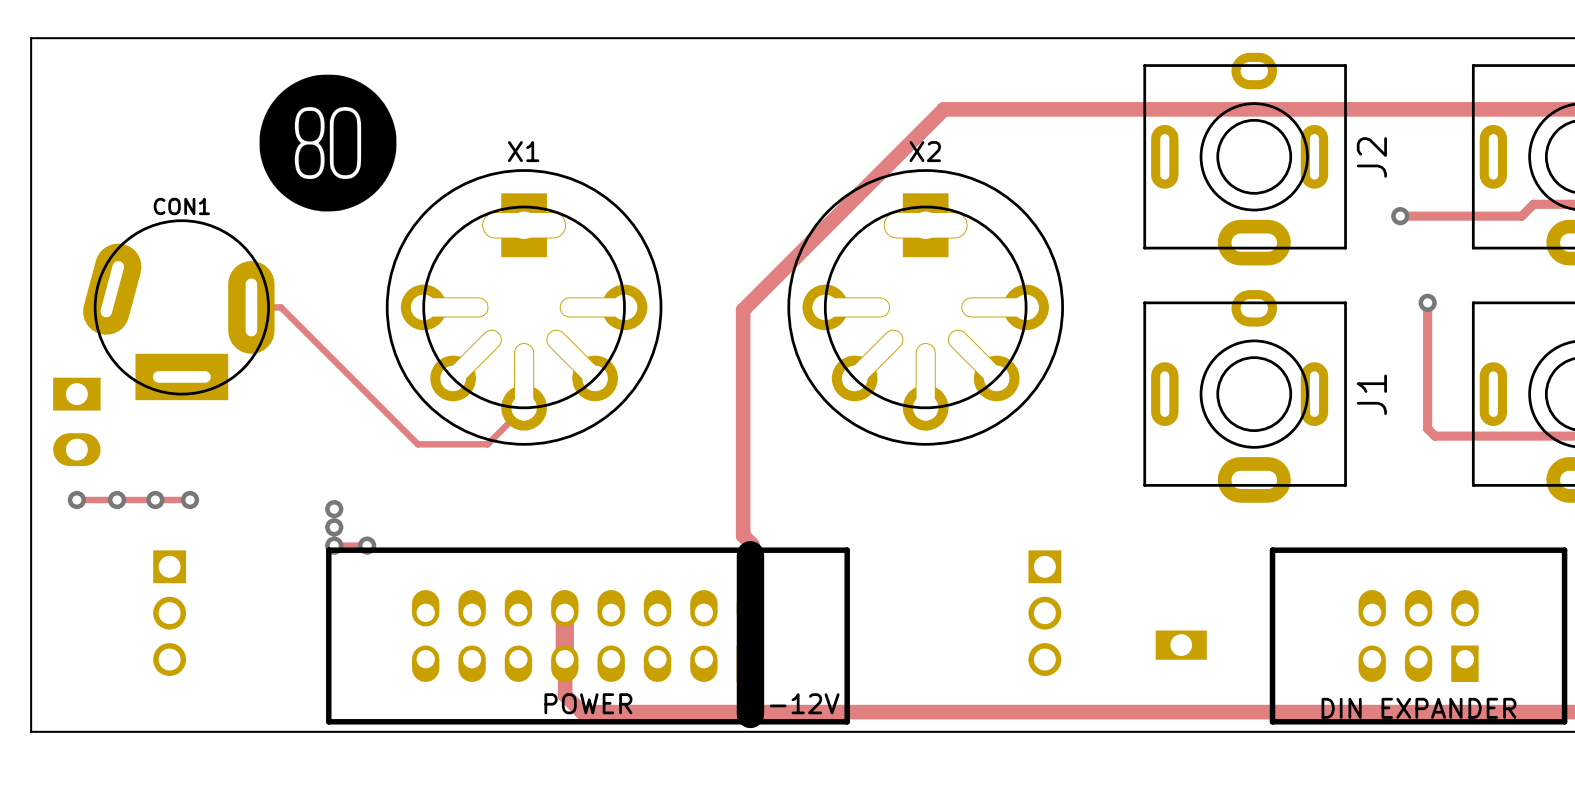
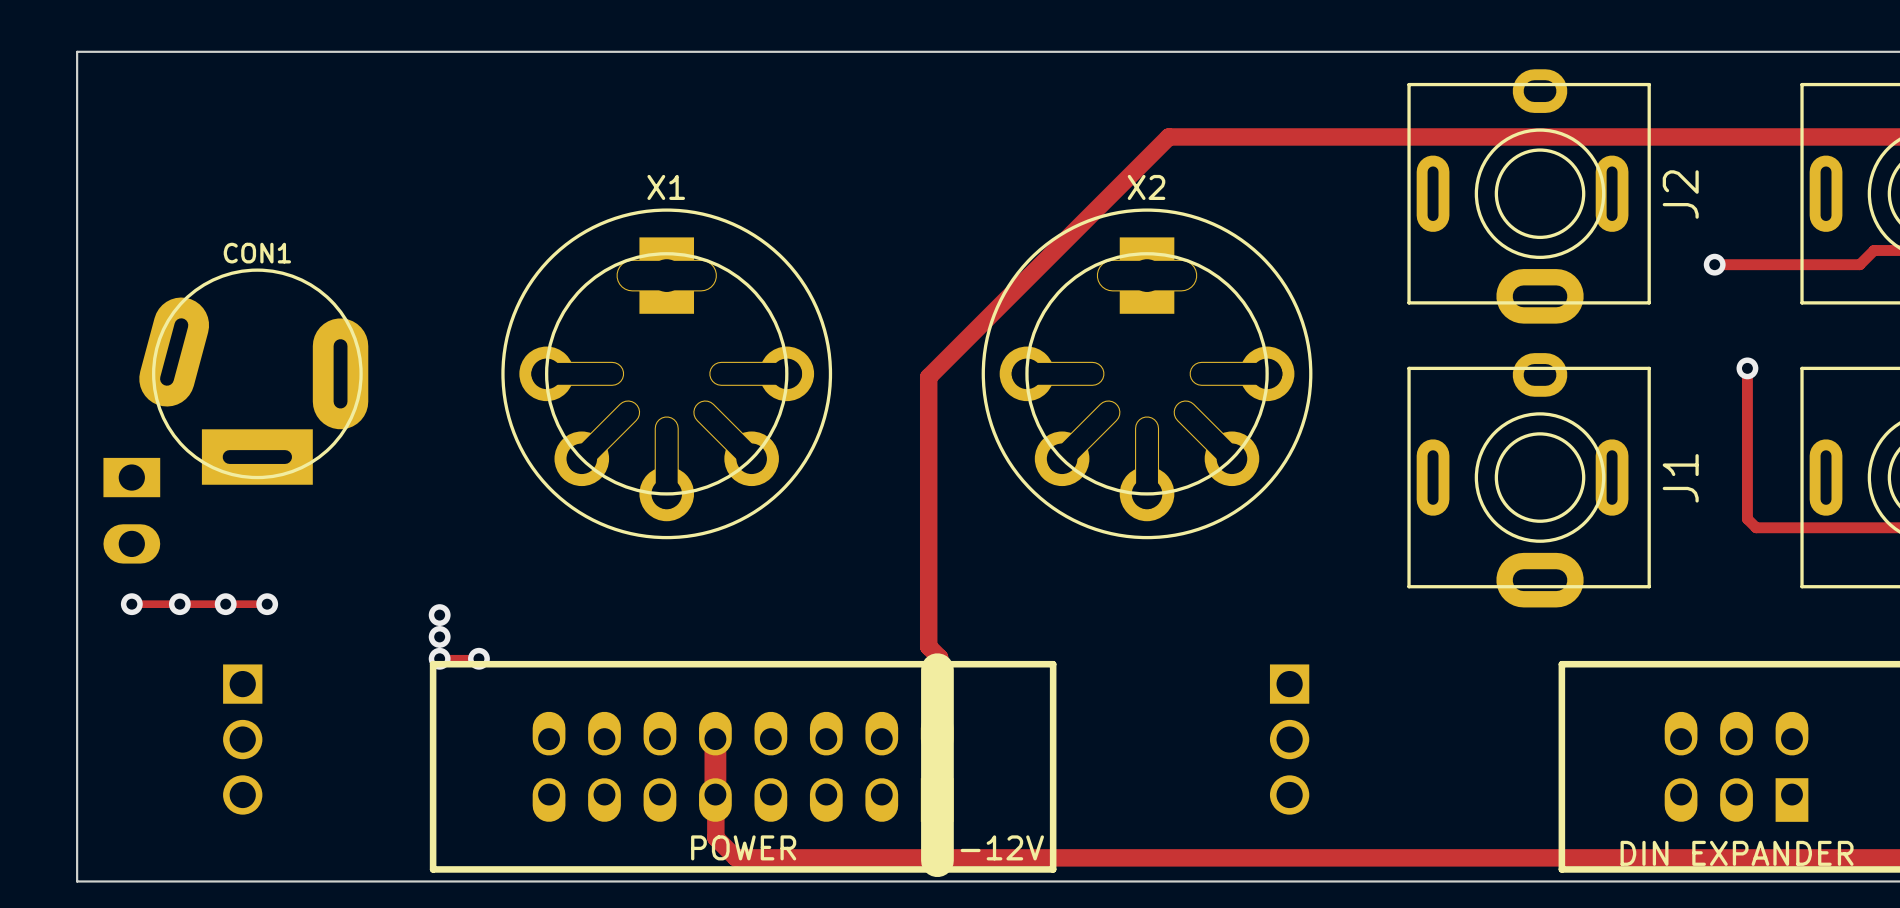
drawing: [259, 74, 397, 212] -> none
track: (251, 307) (280, 307) (417, 444) (487, 444) (509, 422) -> none
part: (1181, 645) -> none

